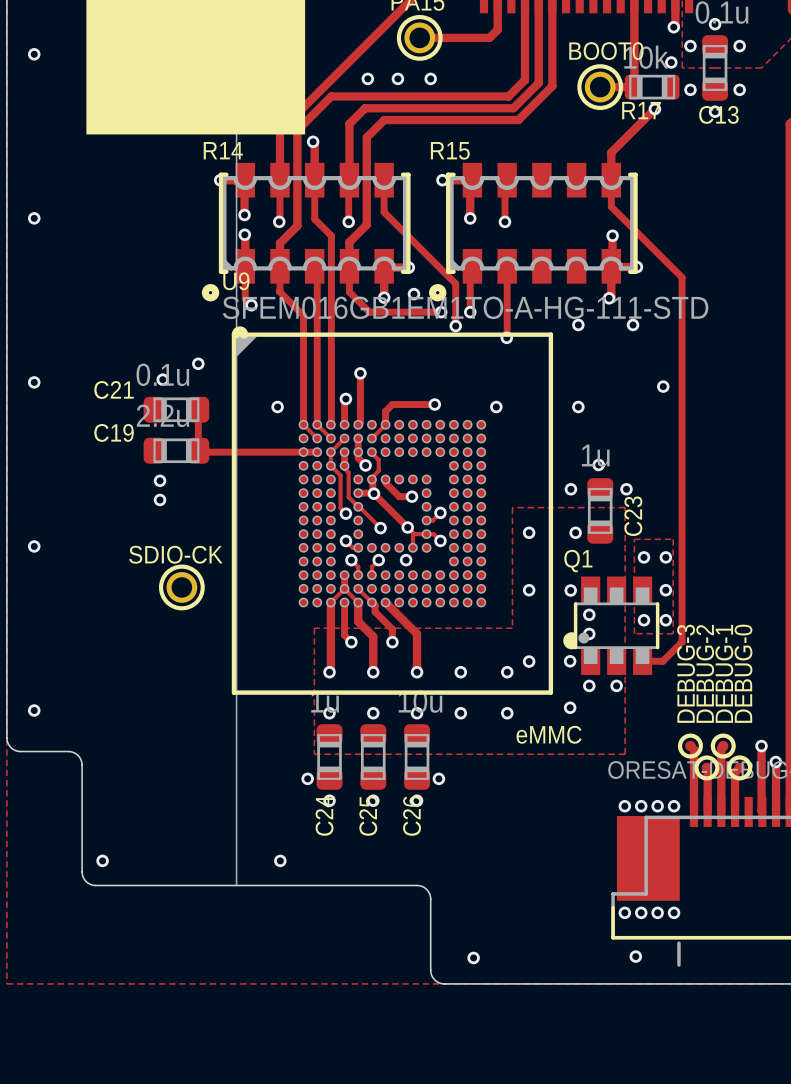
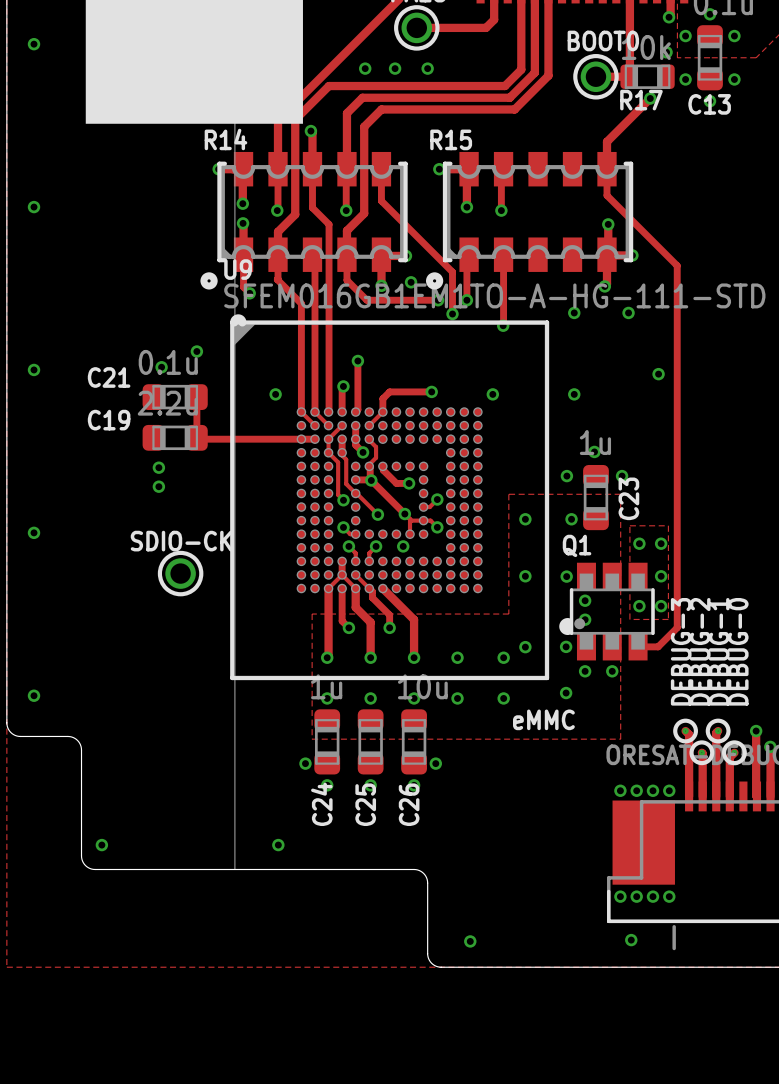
DEBUG-3 footprint: [677, 733, 703, 759] -> [673, 718, 698, 744]
DEBUG-1 footprint: [710, 733, 736, 759] -> [705, 718, 731, 744]
DEBUG-2 footprint: [694, 755, 720, 781] -> [689, 740, 715, 766]
DEBUG-0 footprint: [727, 755, 753, 781] -> [722, 740, 747, 766]

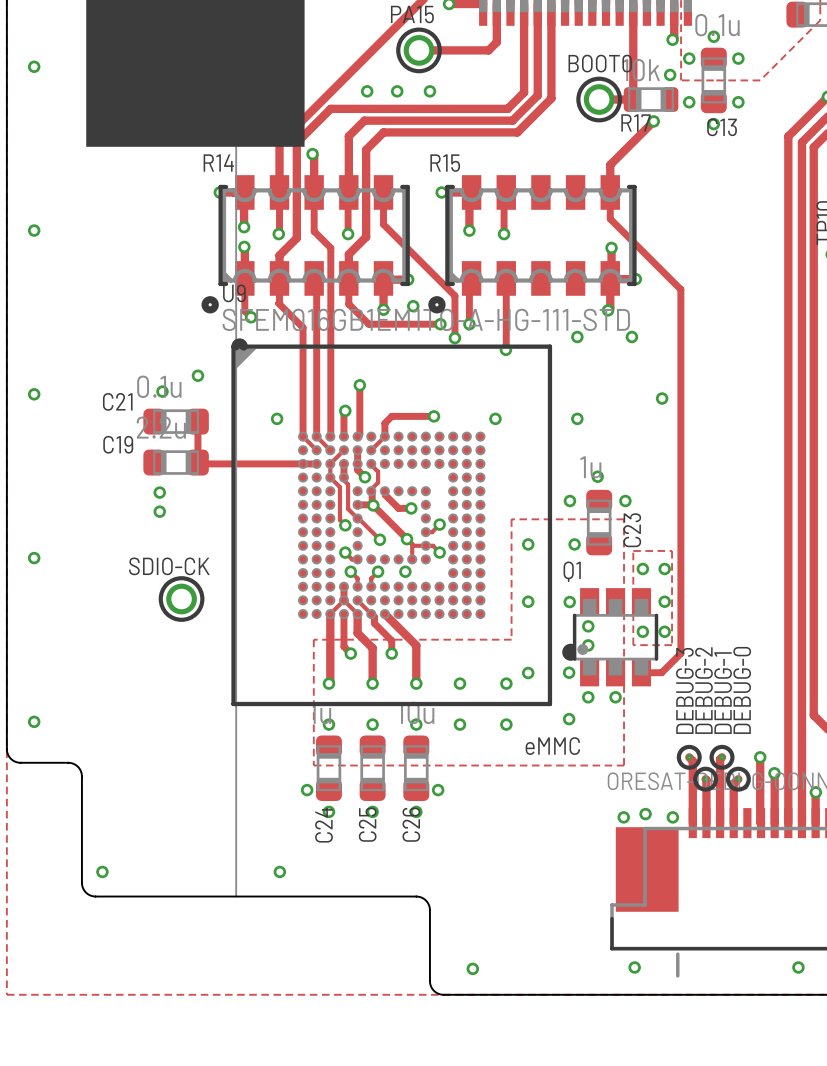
via: none -> (645, 814)
via: (636, 790) -> none
via: (652, 790) -> none
via: (620, 896) -> none
via: (636, 896) -> none
via: (652, 896) -> none
via: (669, 896) -> none

